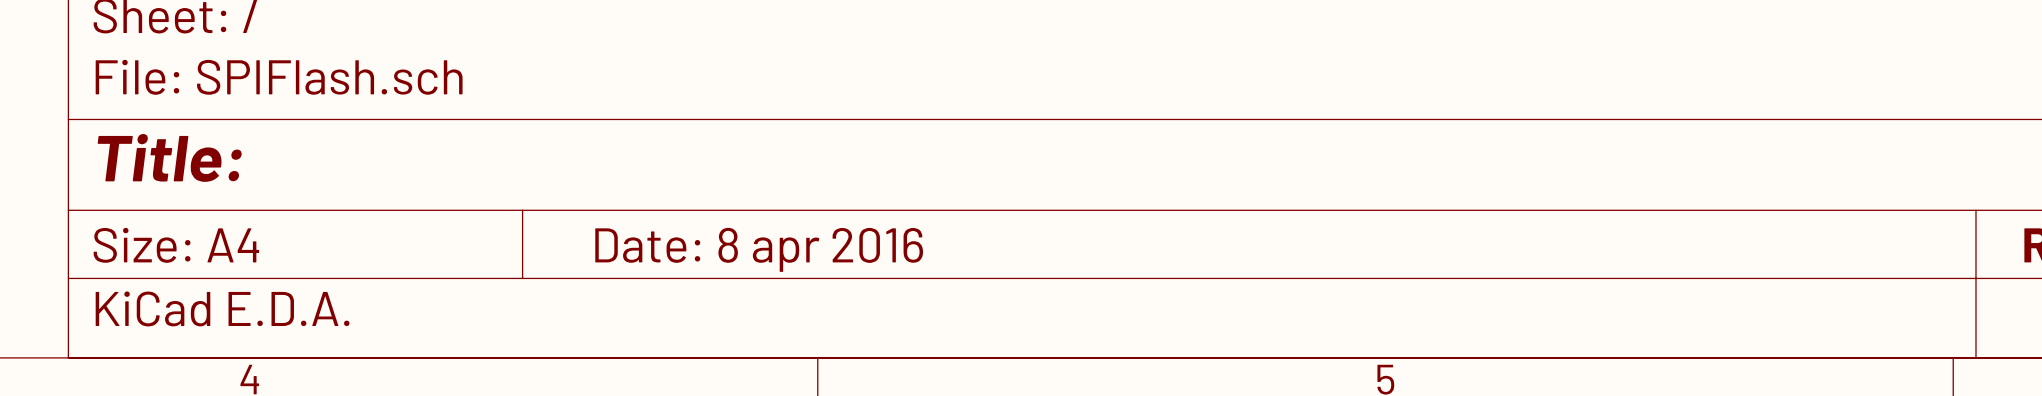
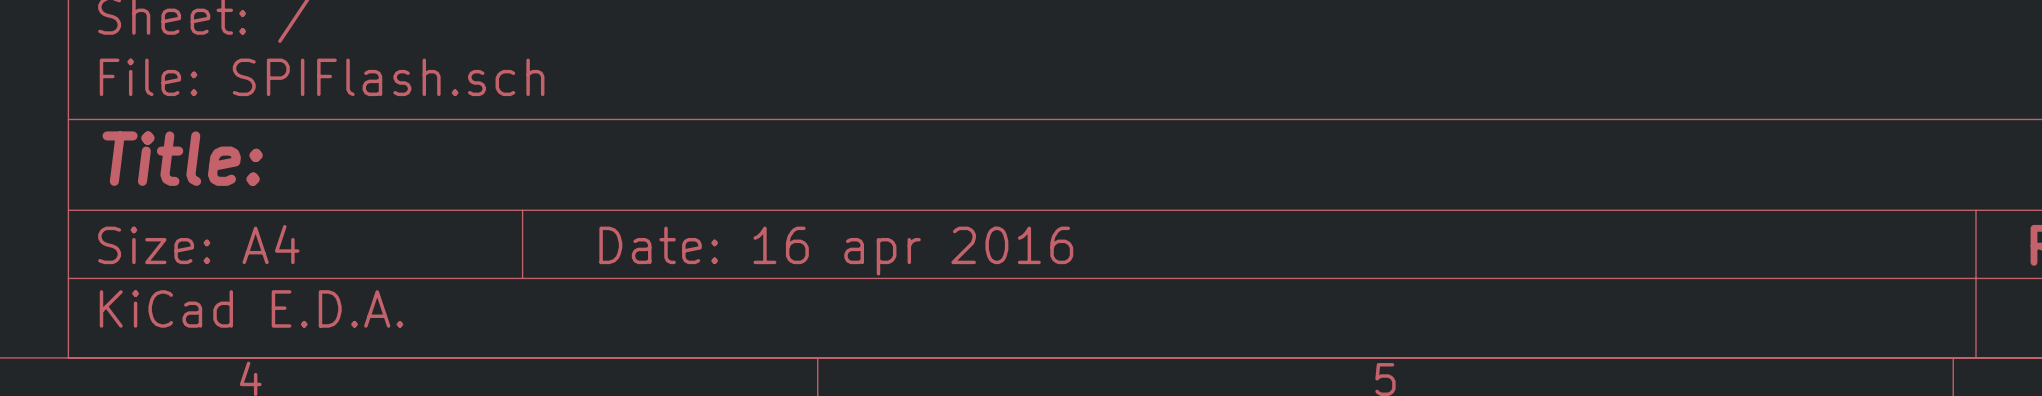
title block: Date: 8 apr 2016 (759, 249) -> Date: 16 apr 2016 (836, 251)

